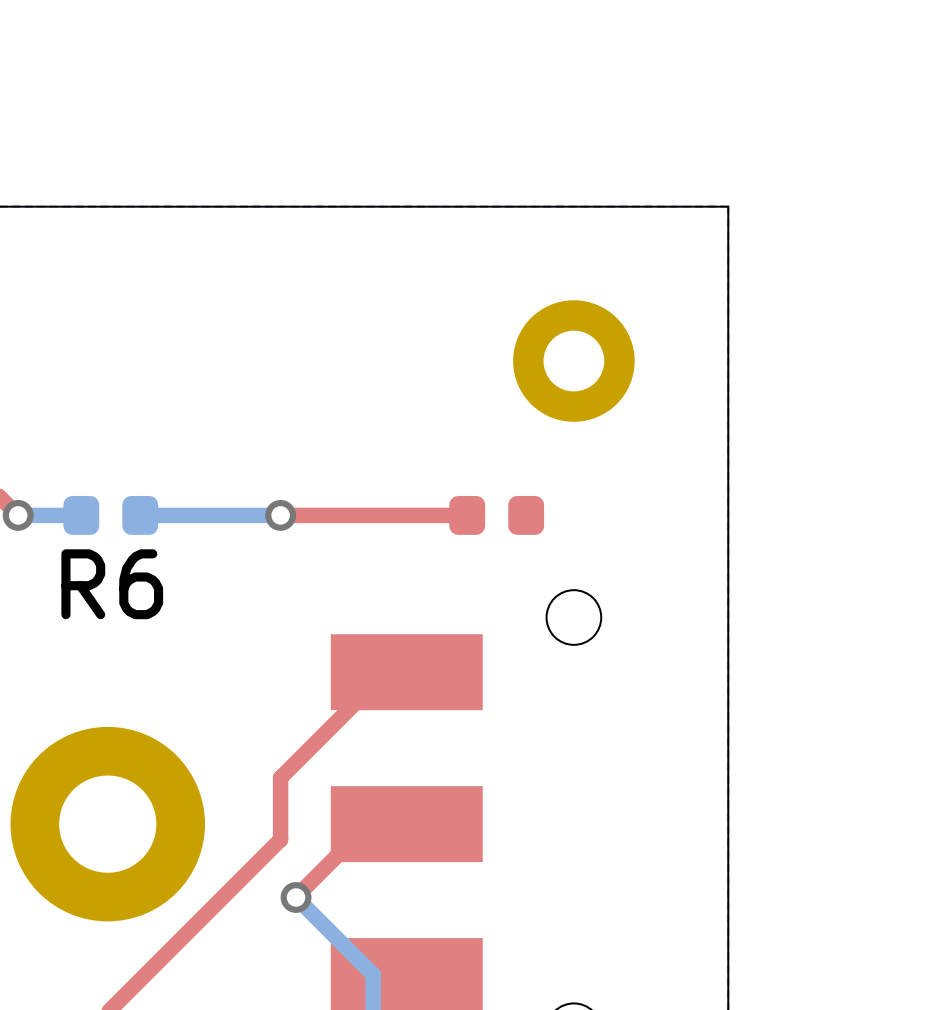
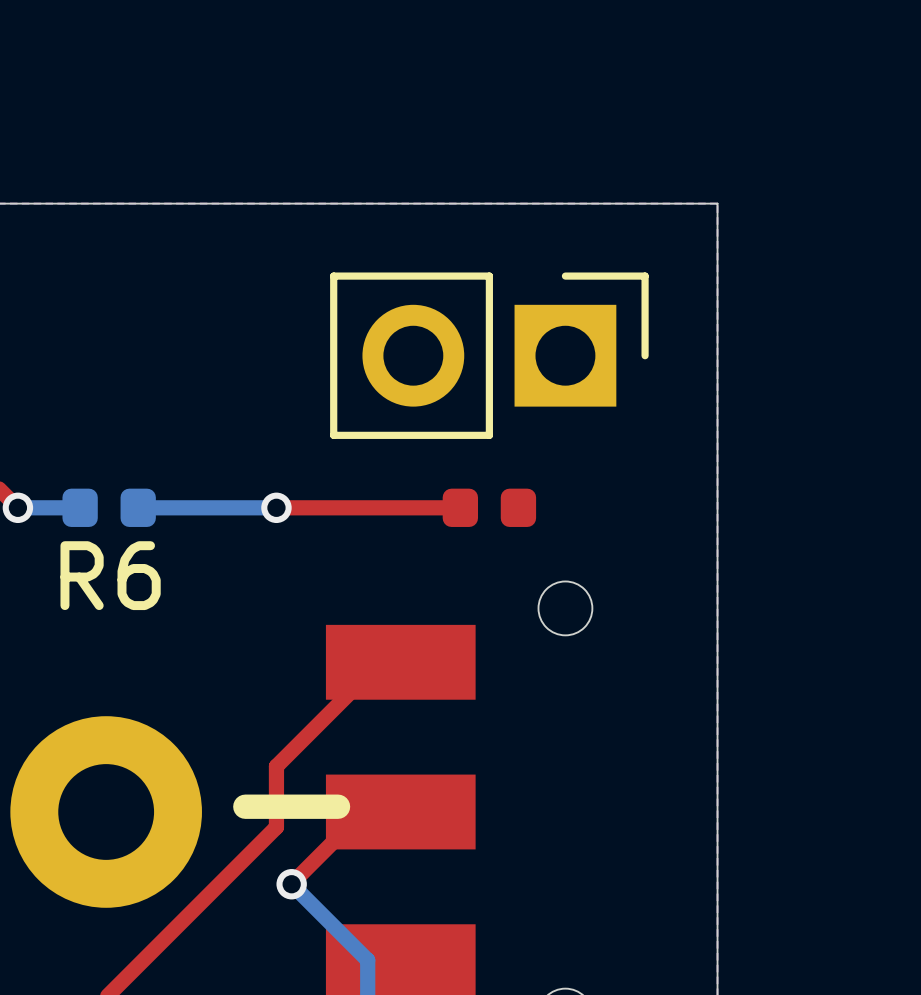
part: none -> (489, 355)
part: (573, 361) -> none
text: none -> - (291, 806)

